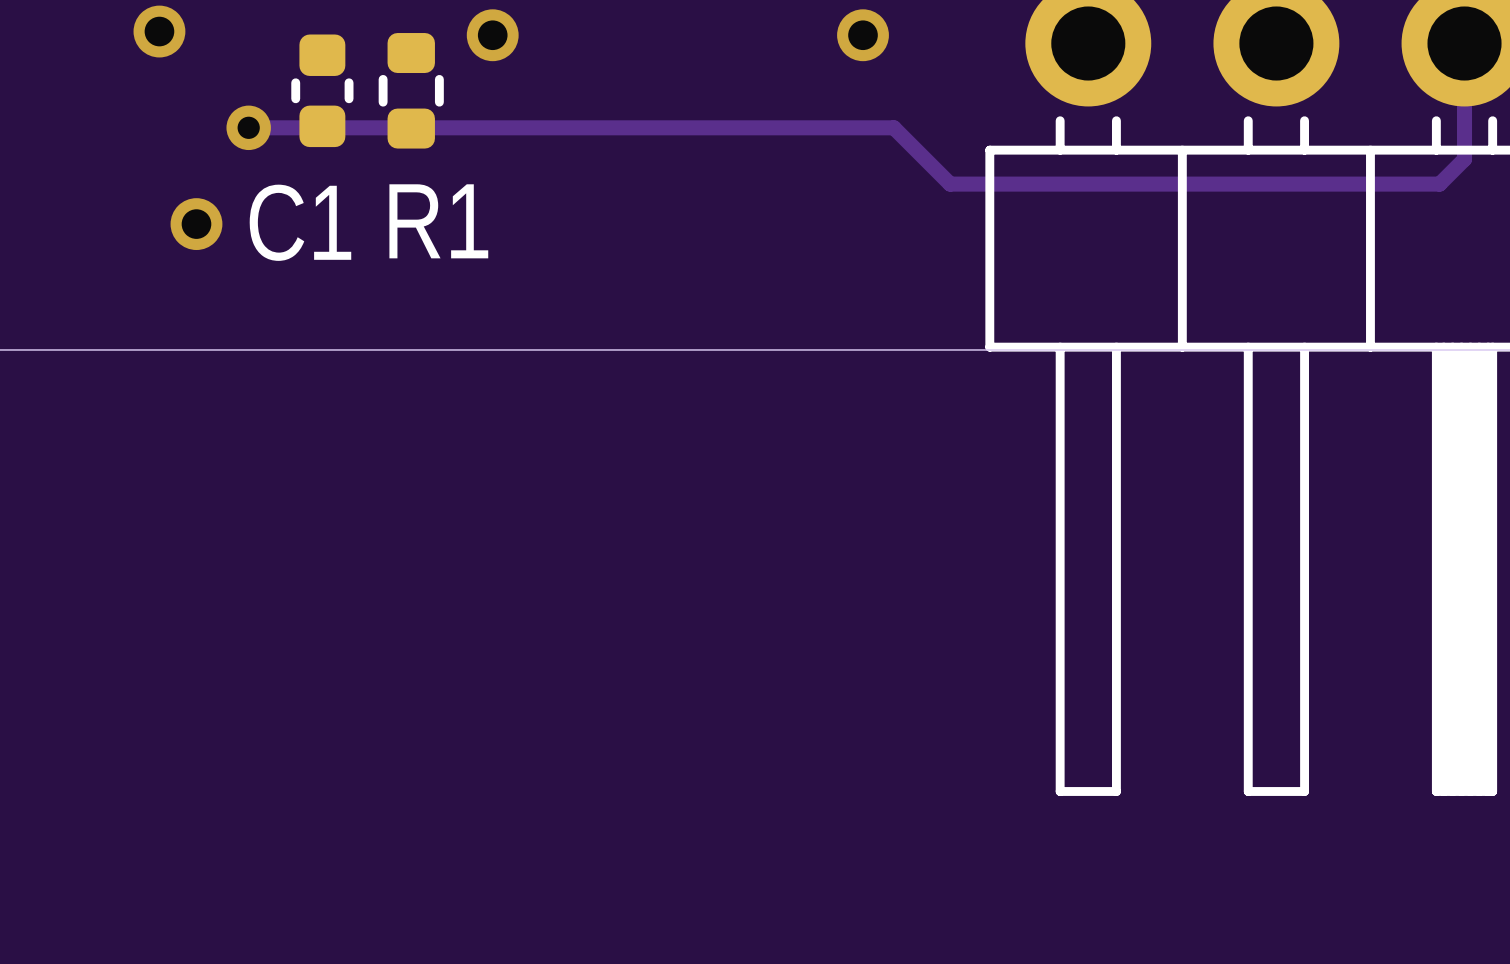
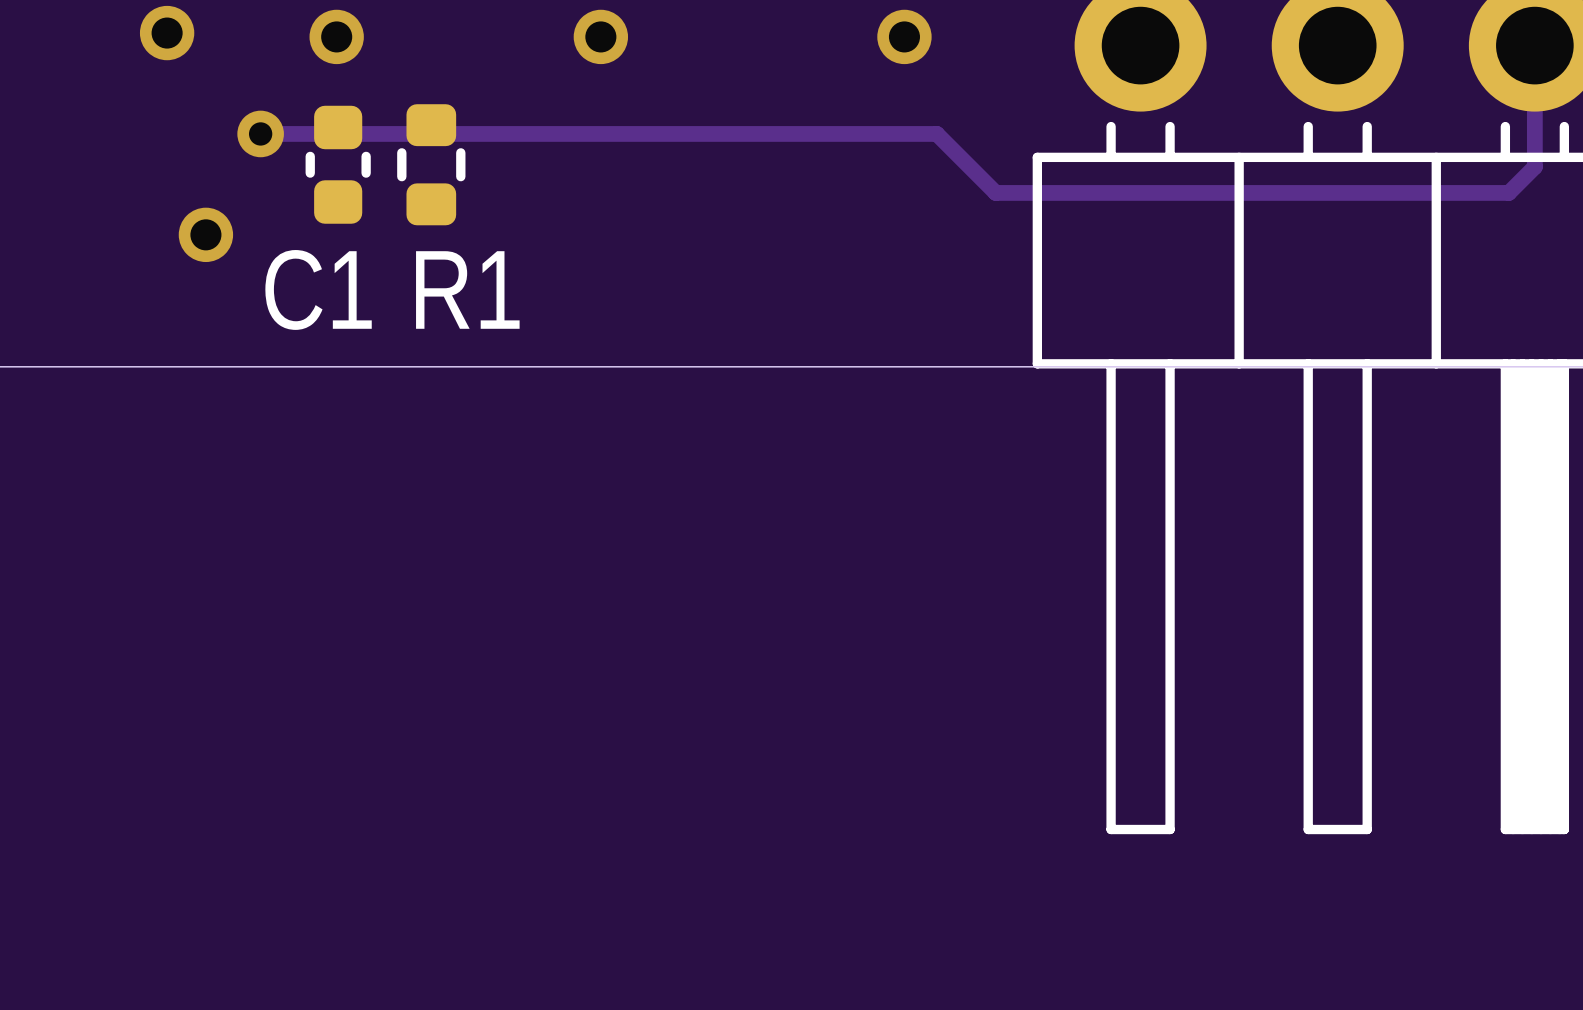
via: none -> (336, 36)
via position: (492, 35) -> (600, 36)
C1 position: (322, 90) -> (338, 164)
R1 position: (411, 90) -> (431, 164)
R1 name position: R1 (438, 221) -> R1 (467, 289)
C1 name position: C1 (300, 222) -> C1 (318, 289)

